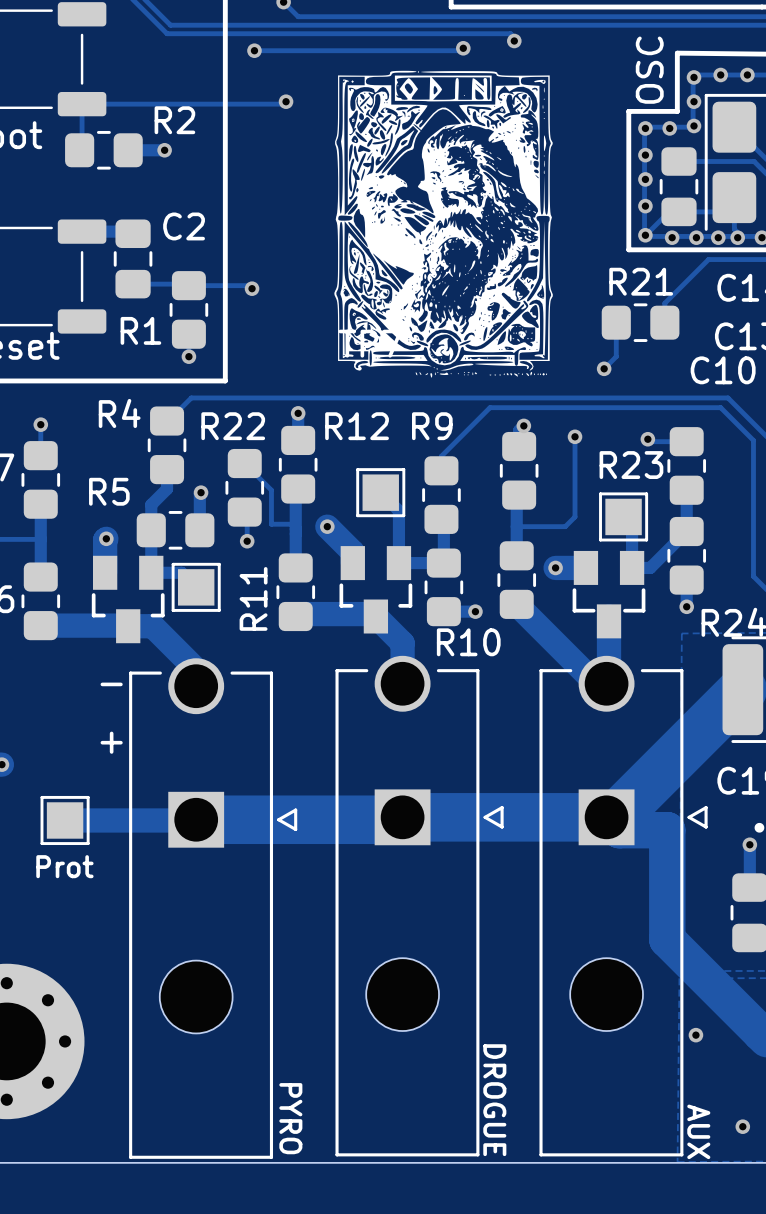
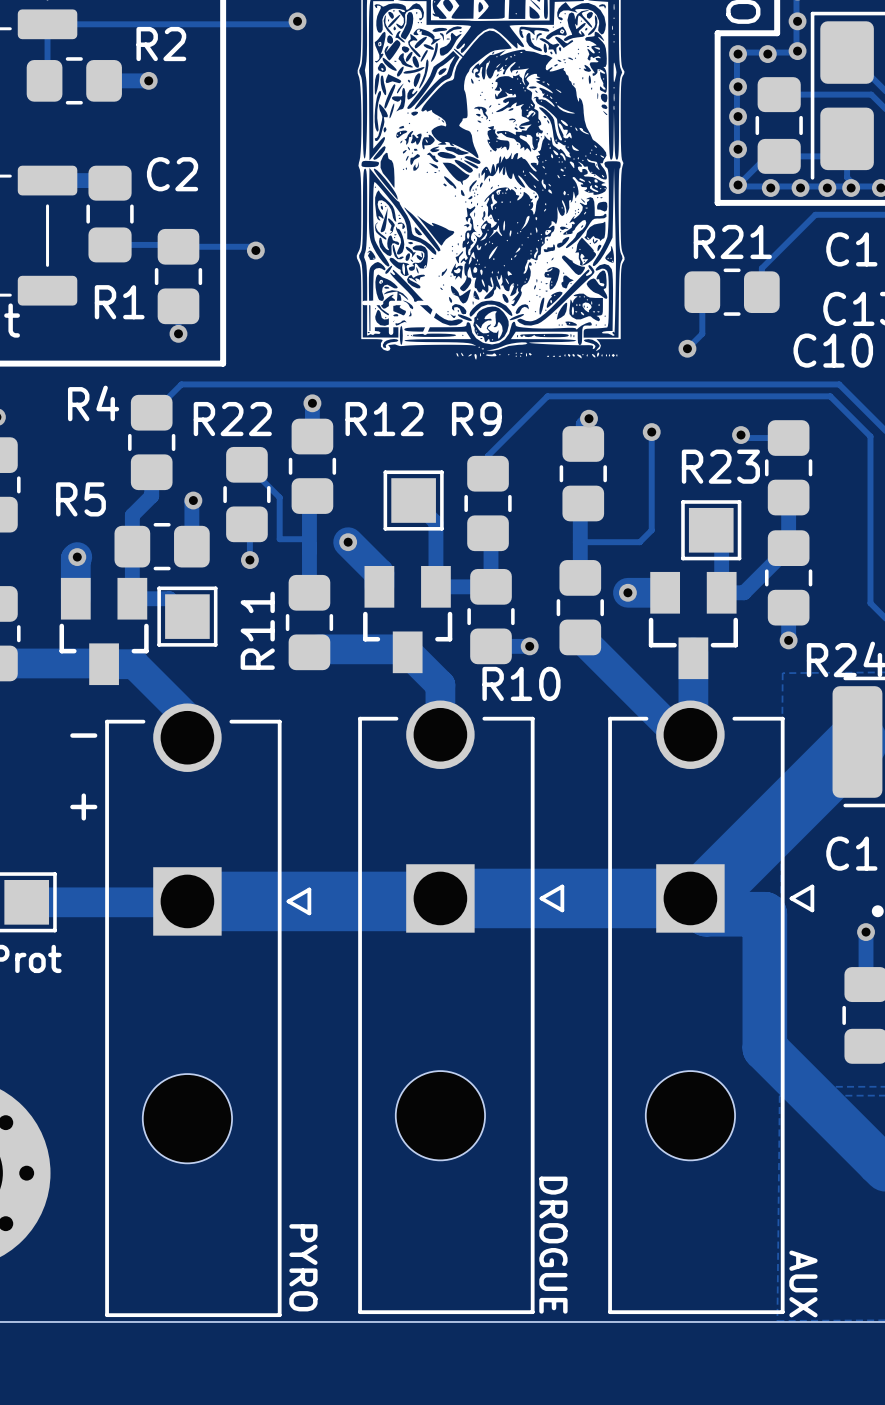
via: (695, 1035) -> none
via: (742, 1126) -> none

